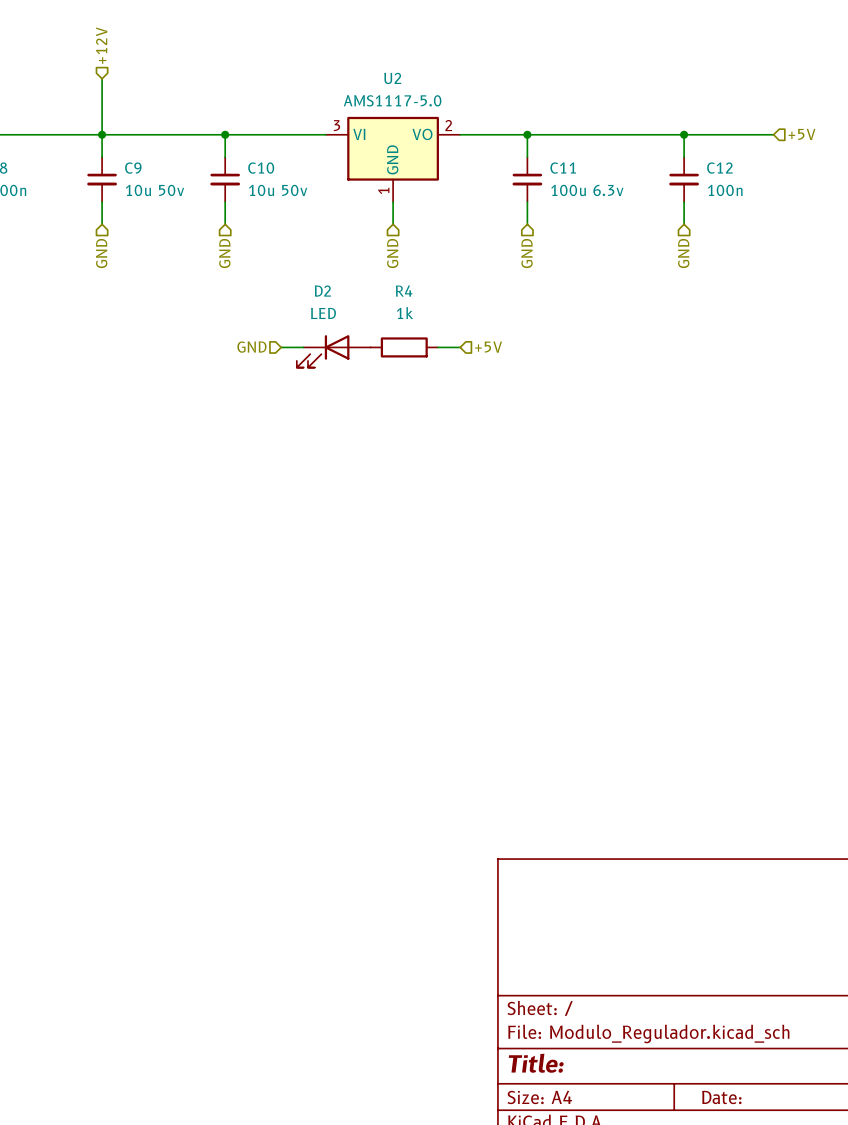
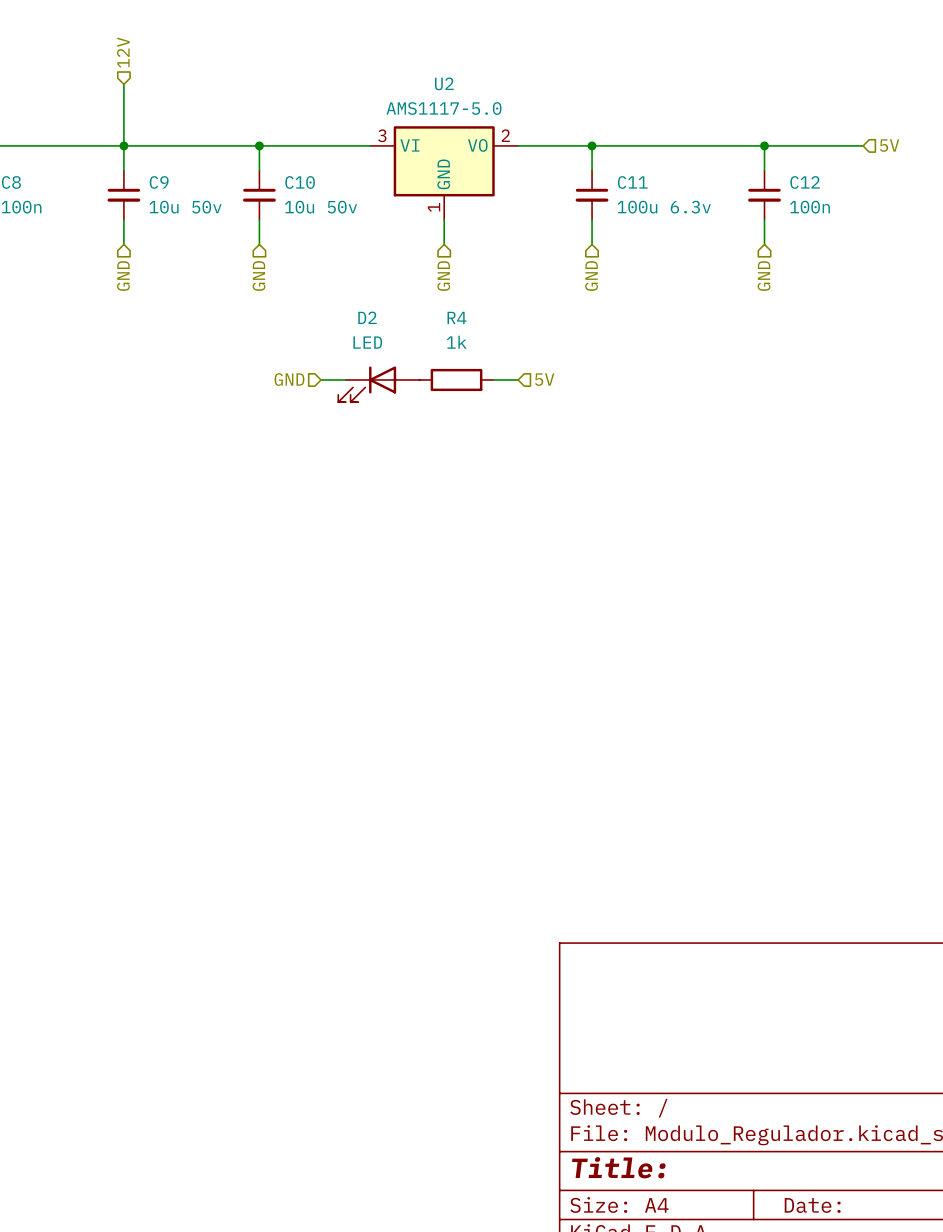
hierarchical label: +12V (101, 45) -> 12V (123, 52)
hierarchical label: +5V (801, 134) -> 5V (889, 145)
hierarchical label: +5V (488, 347) -> 5V (544, 379)

